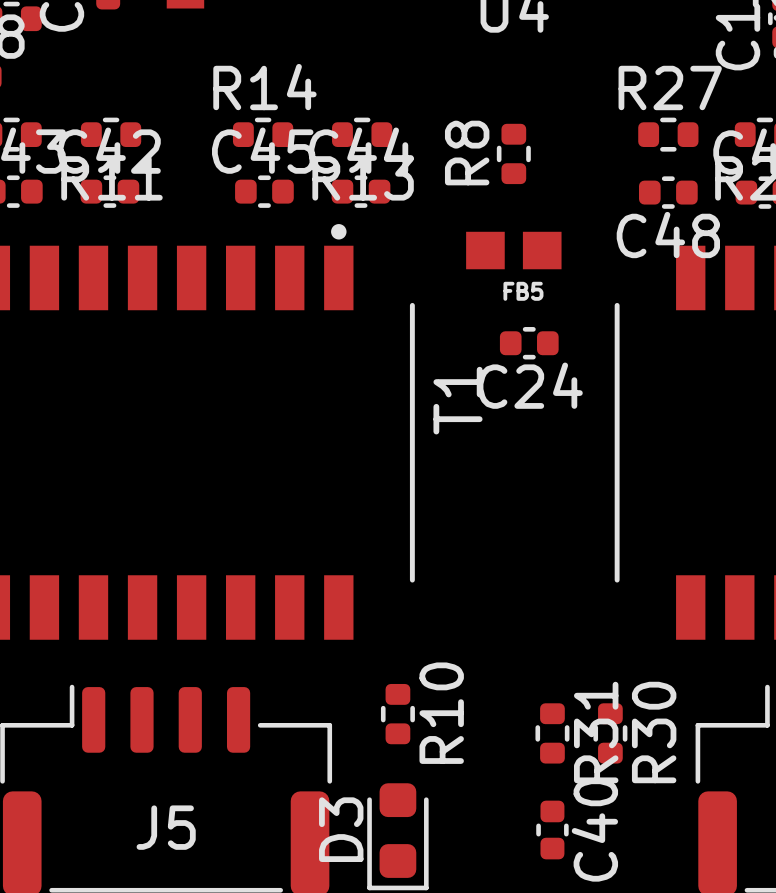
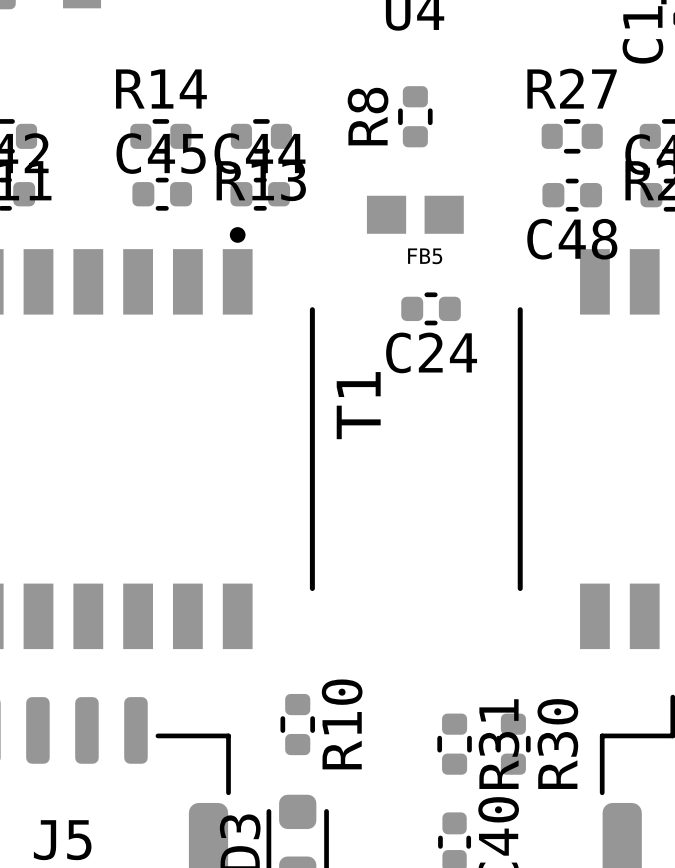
R8 position: (513, 153) -> (415, 116)
FB5 position: (513, 250) -> (415, 214)
C24 position: (529, 343) -> (431, 308)

